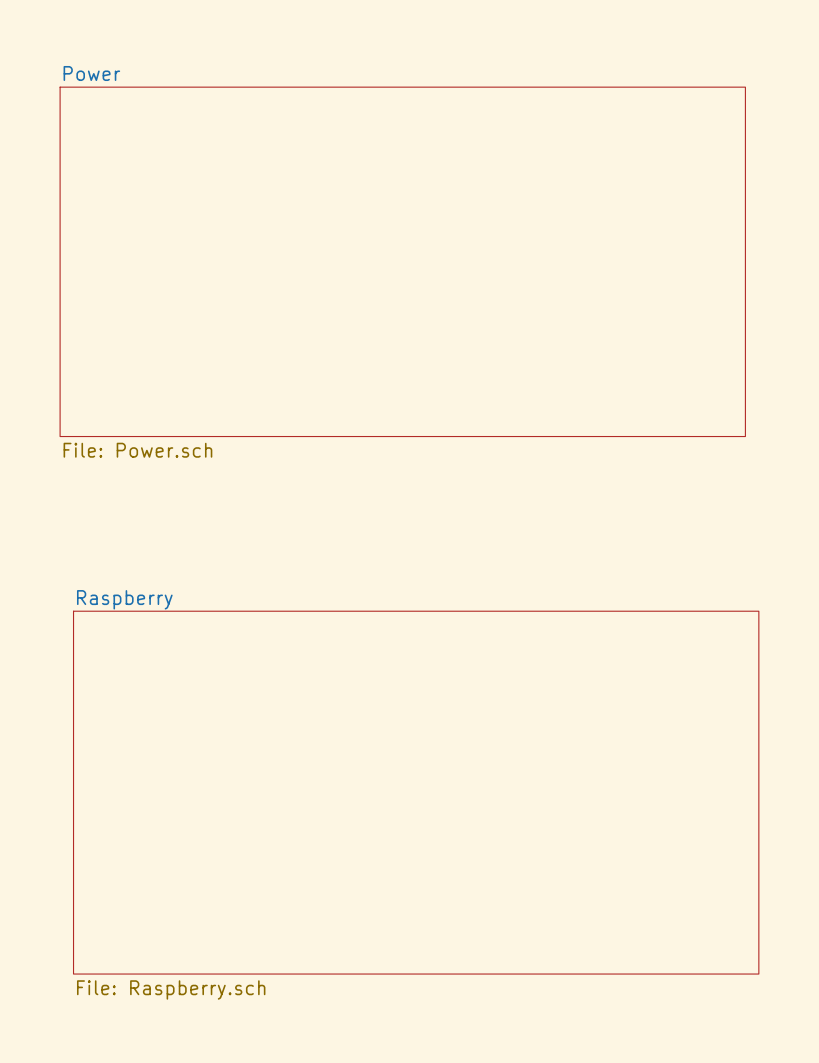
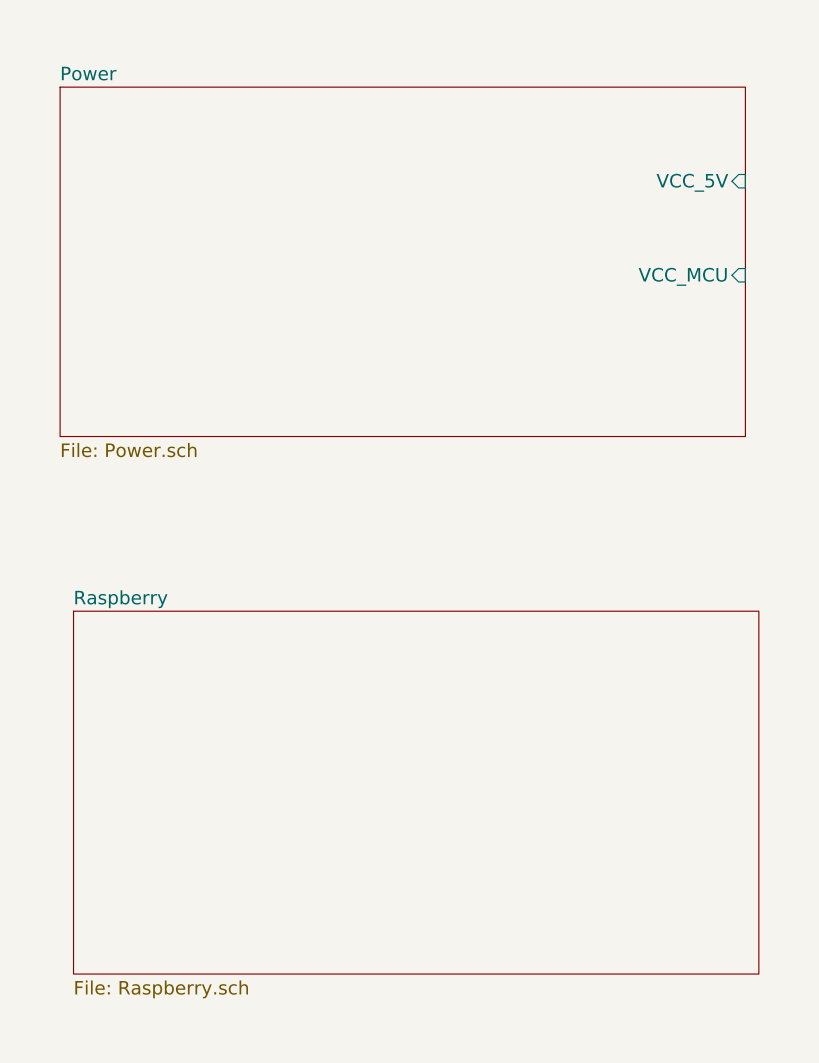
sheet pin: none -> VCC_5V (692, 182)
sheet pin: none -> VCC_MCU (682, 276)

